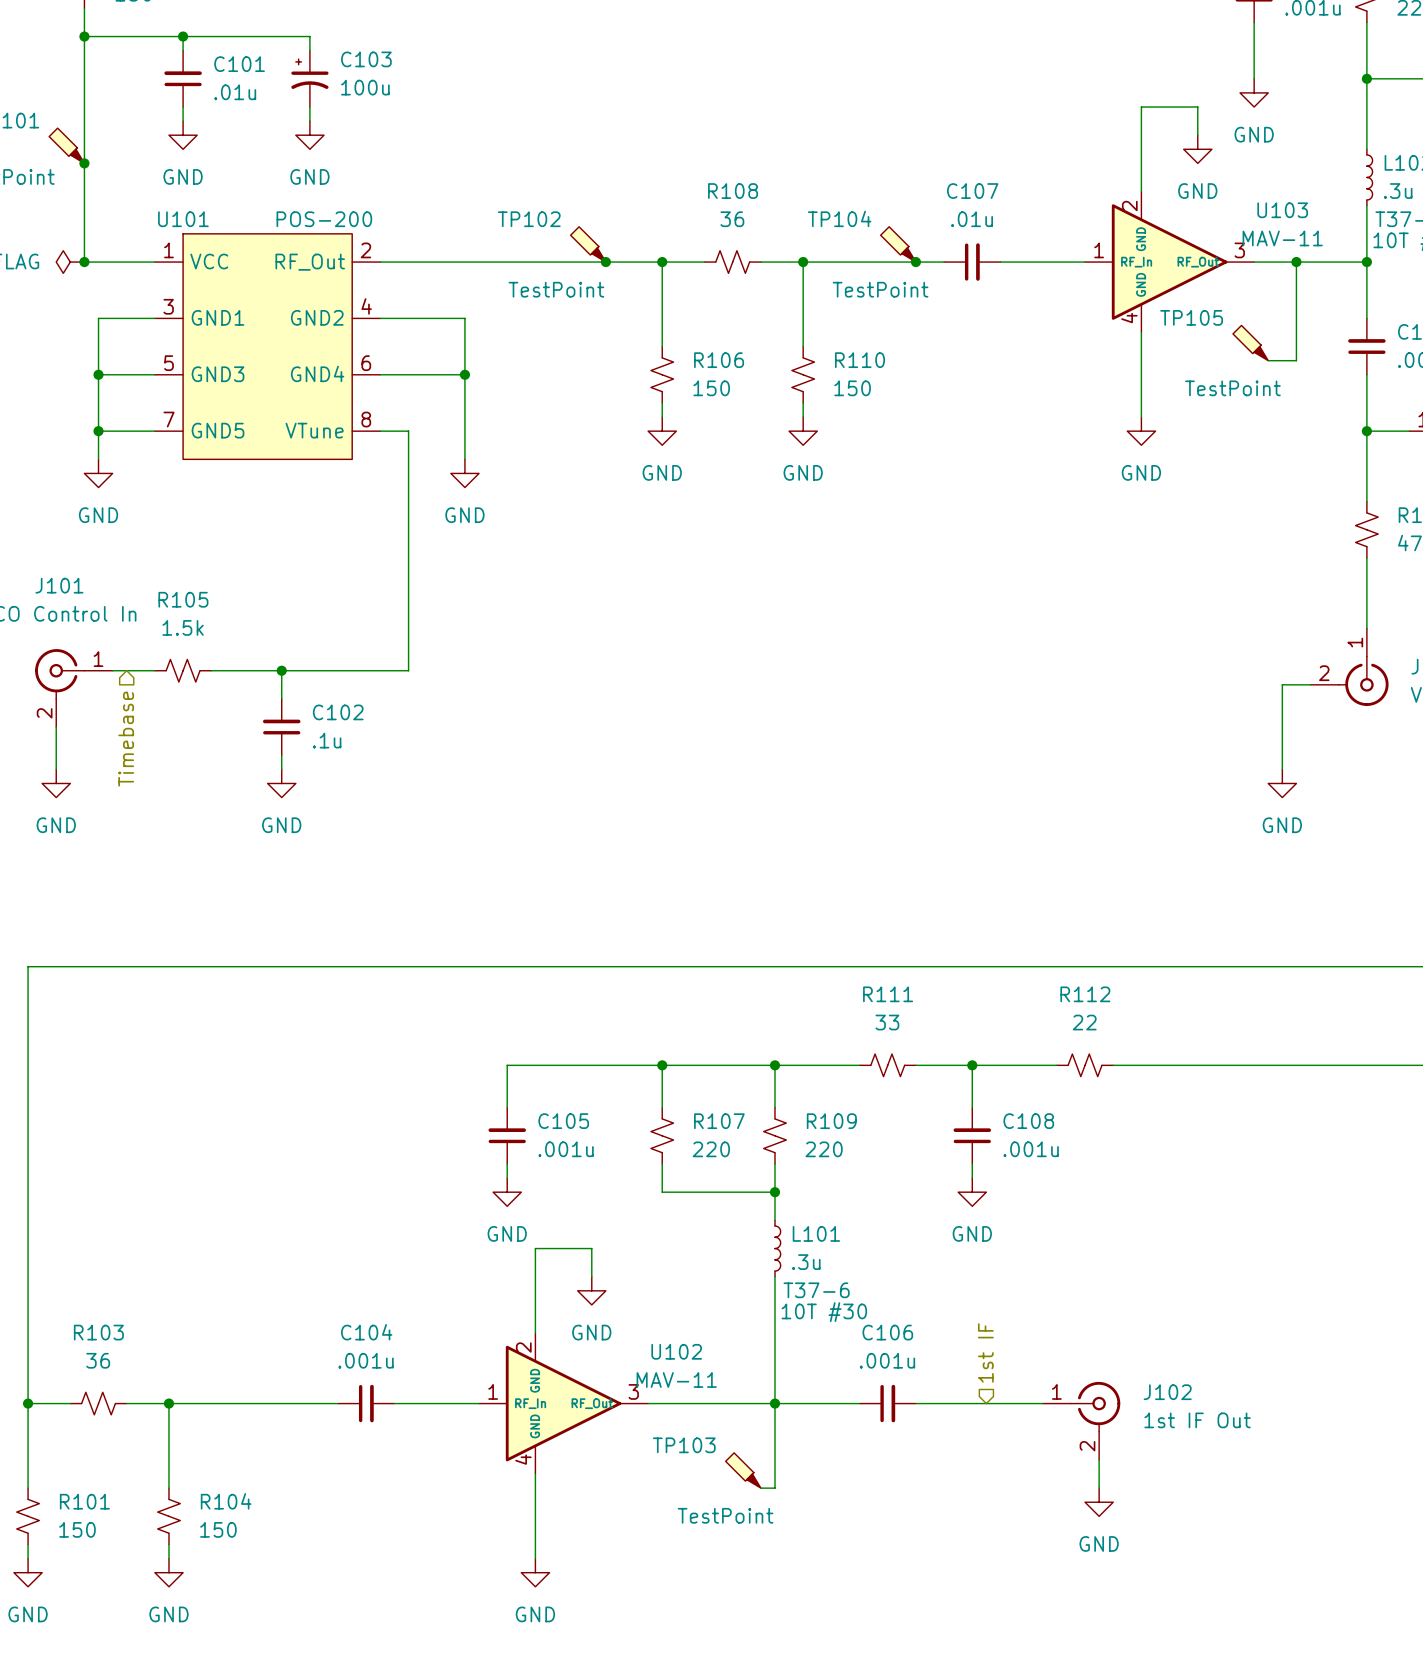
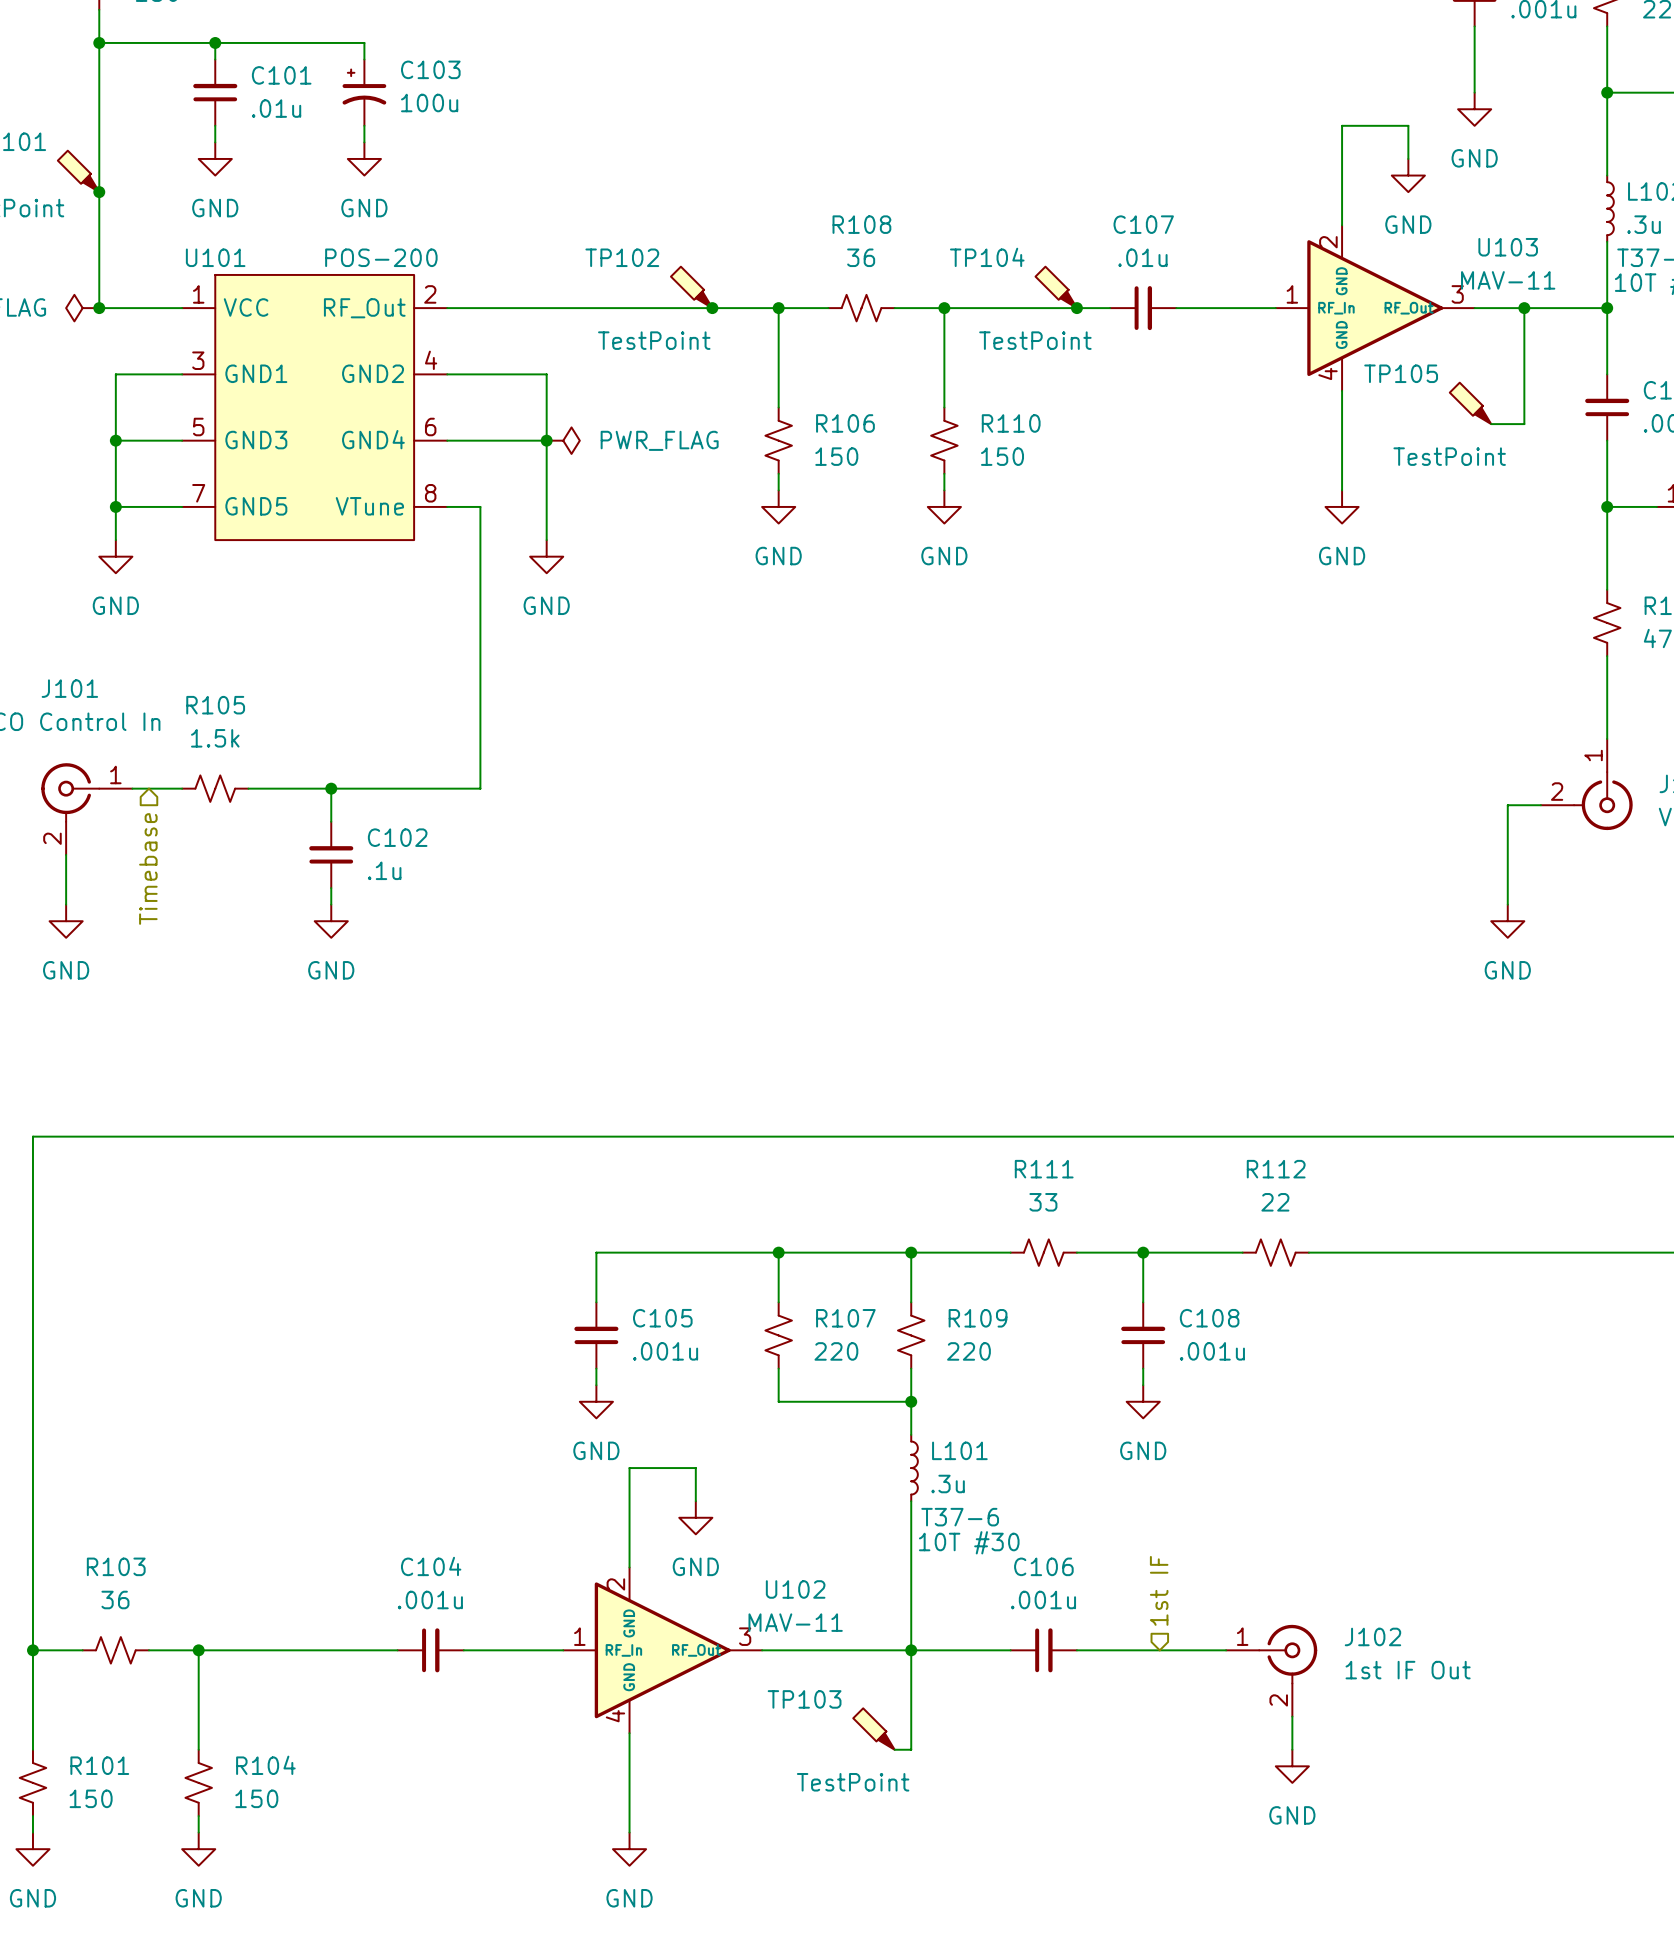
power symbol: none -> PWR_FLAG (563, 440)

